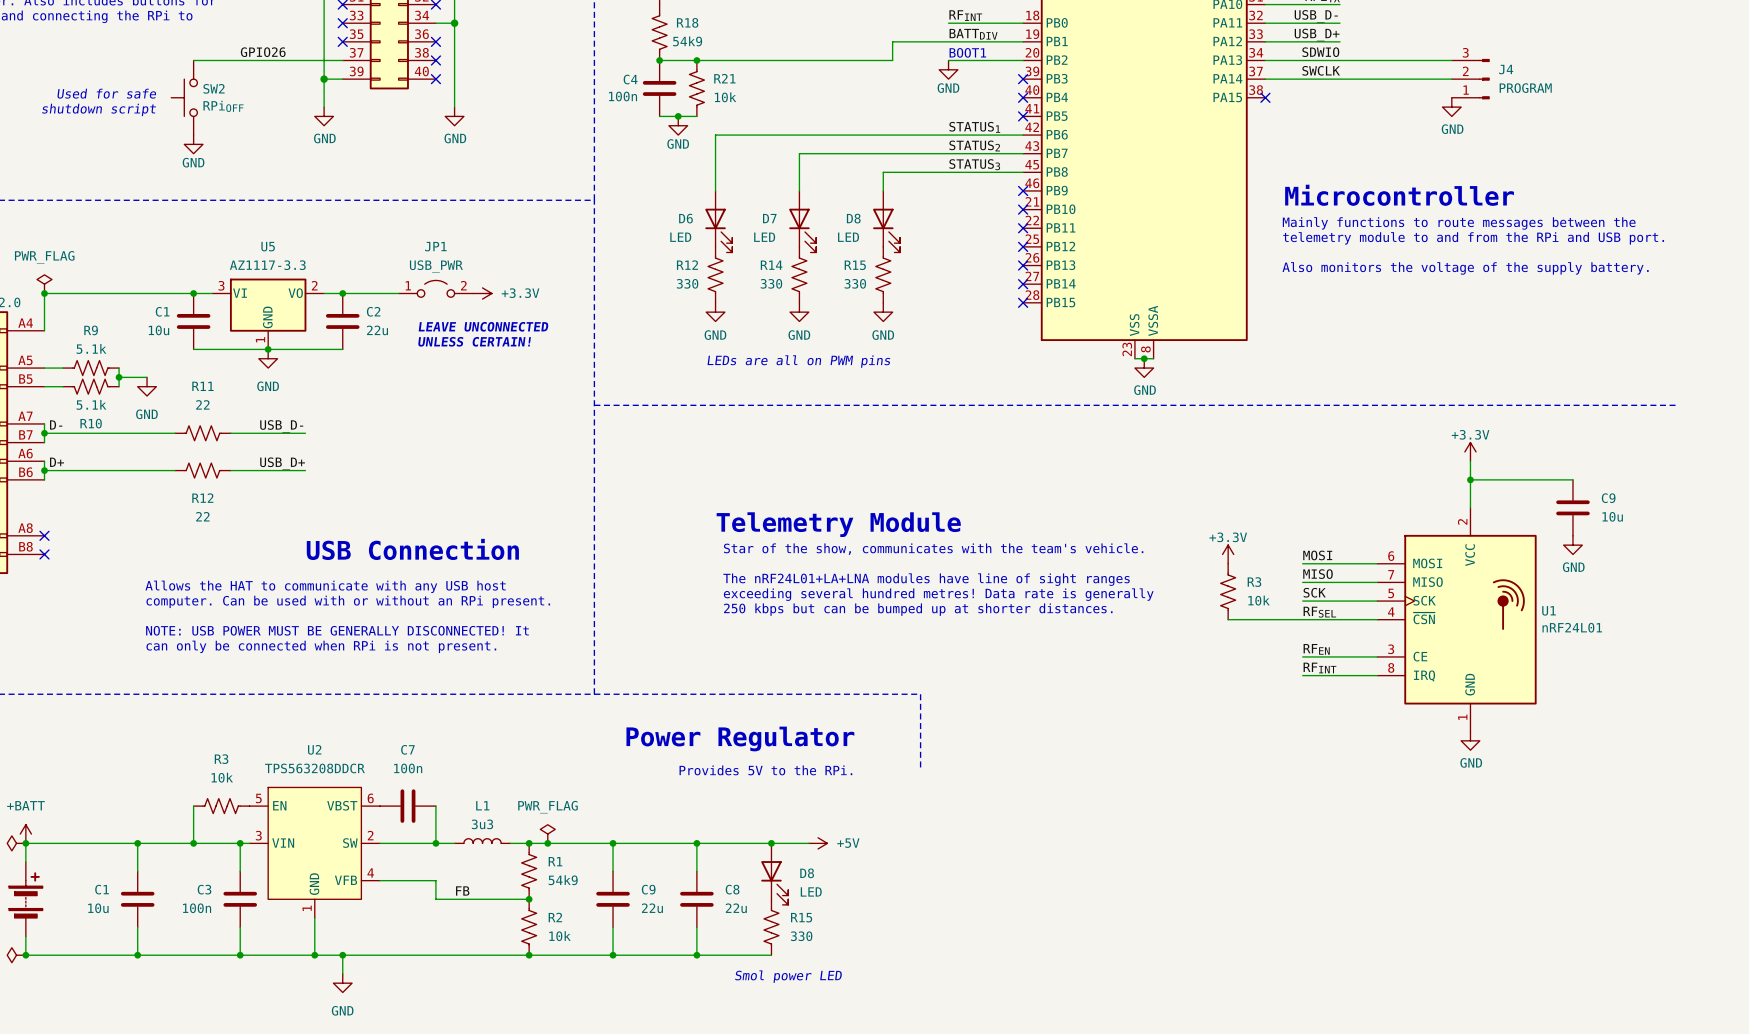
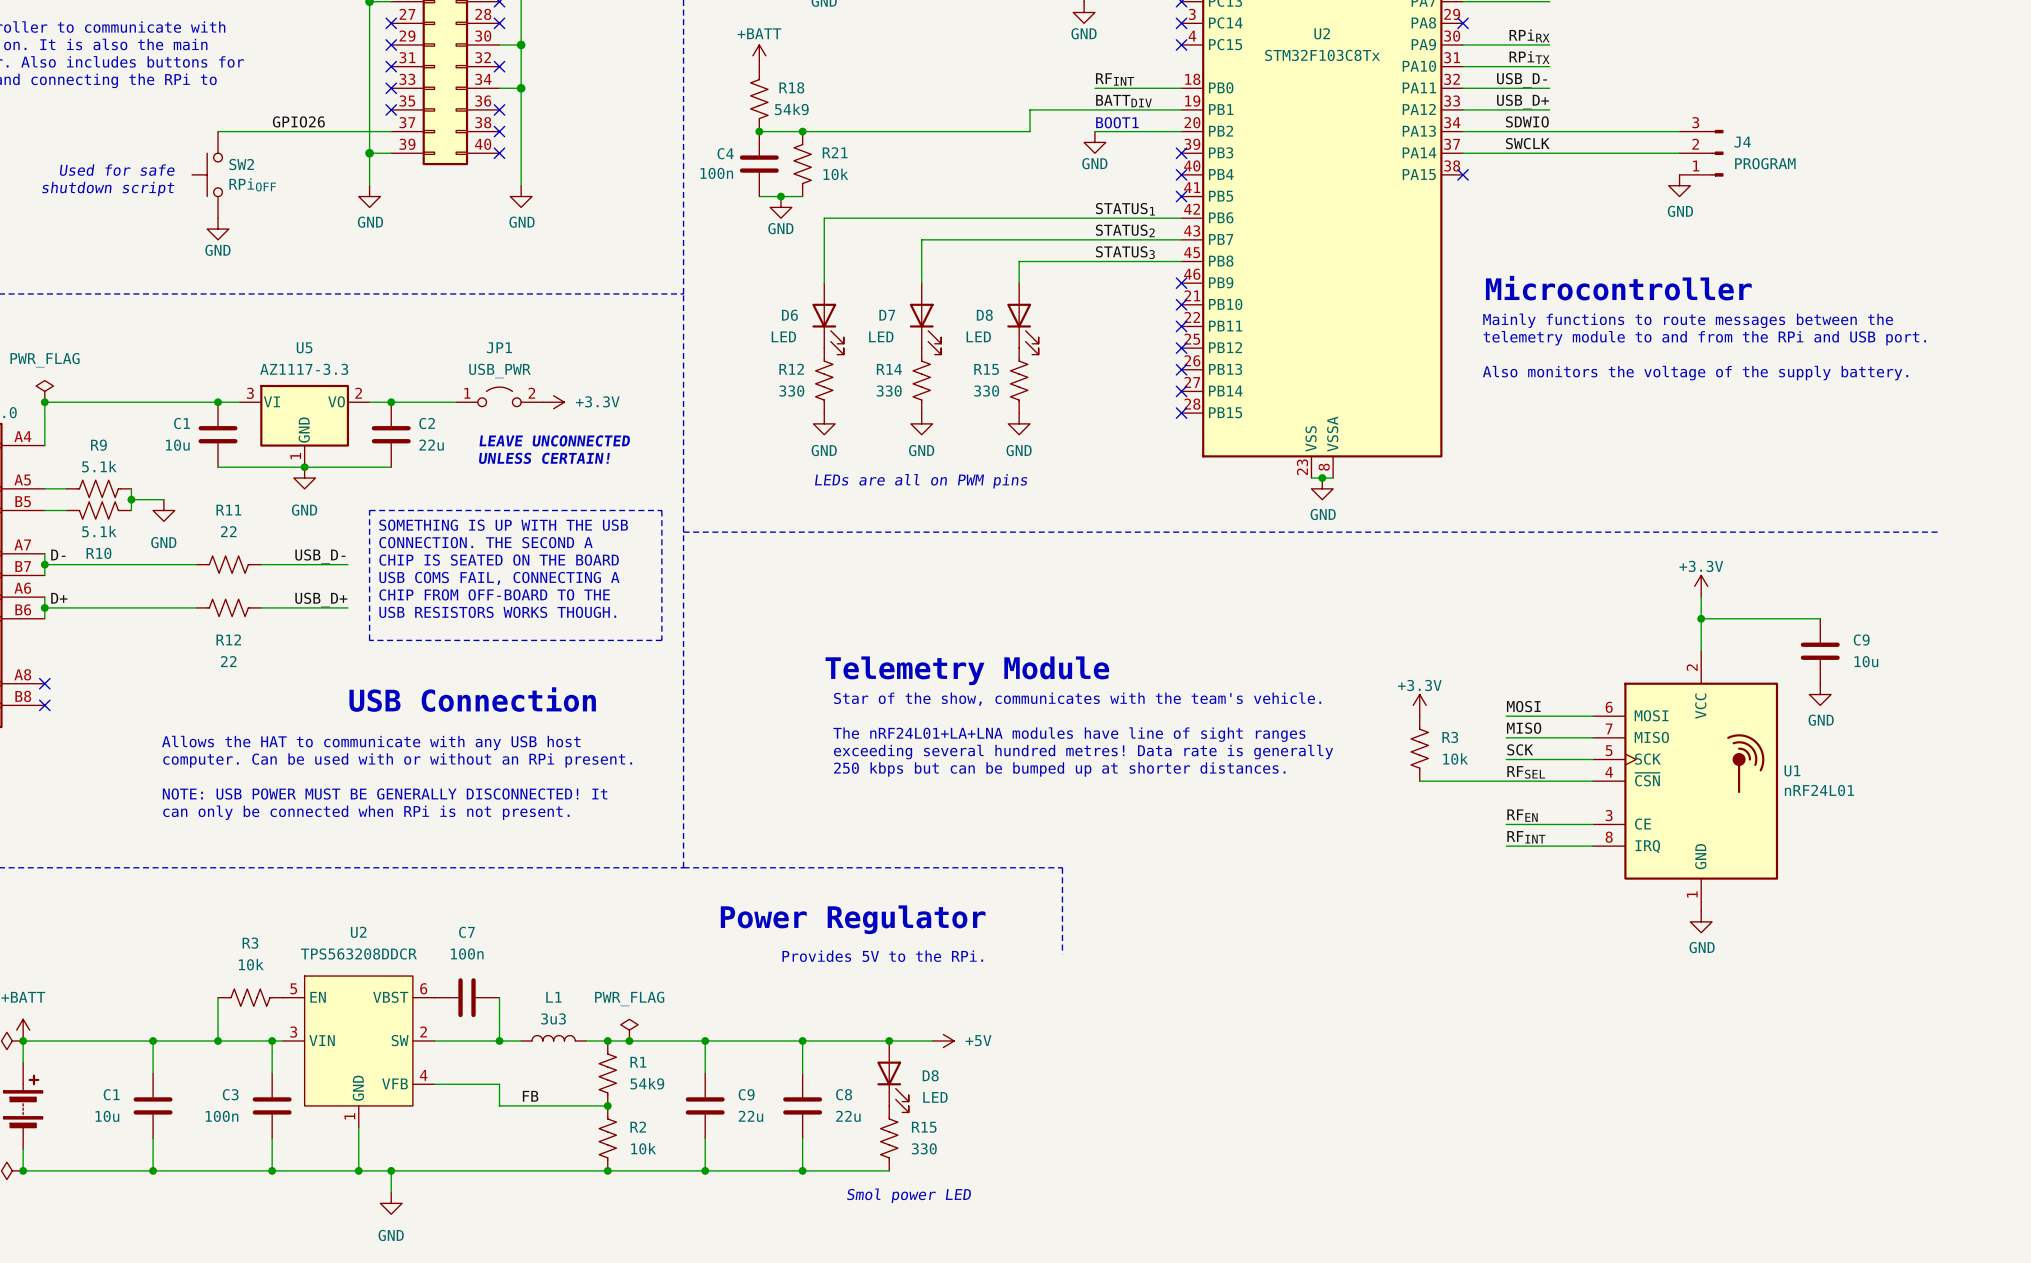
line: none -> (369, 510) (661, 510) (661, 640) (369, 640) (369, 510)
text: none -> SOMETHING IS UP WITH THE USB (503, 525)
text: none -> CONNECTION. THE SECOND A (486, 542)
text: none -> CHIP IS SEATED ON THE BOARD (499, 560)
text: none -> USB COMS FAIL, CONNECTING A (499, 578)
text: none -> CHIP FROM OFF-BOARD TO THE (494, 594)
text: none -> USB RESISTORS WORKS THOUGH. (497, 612)

